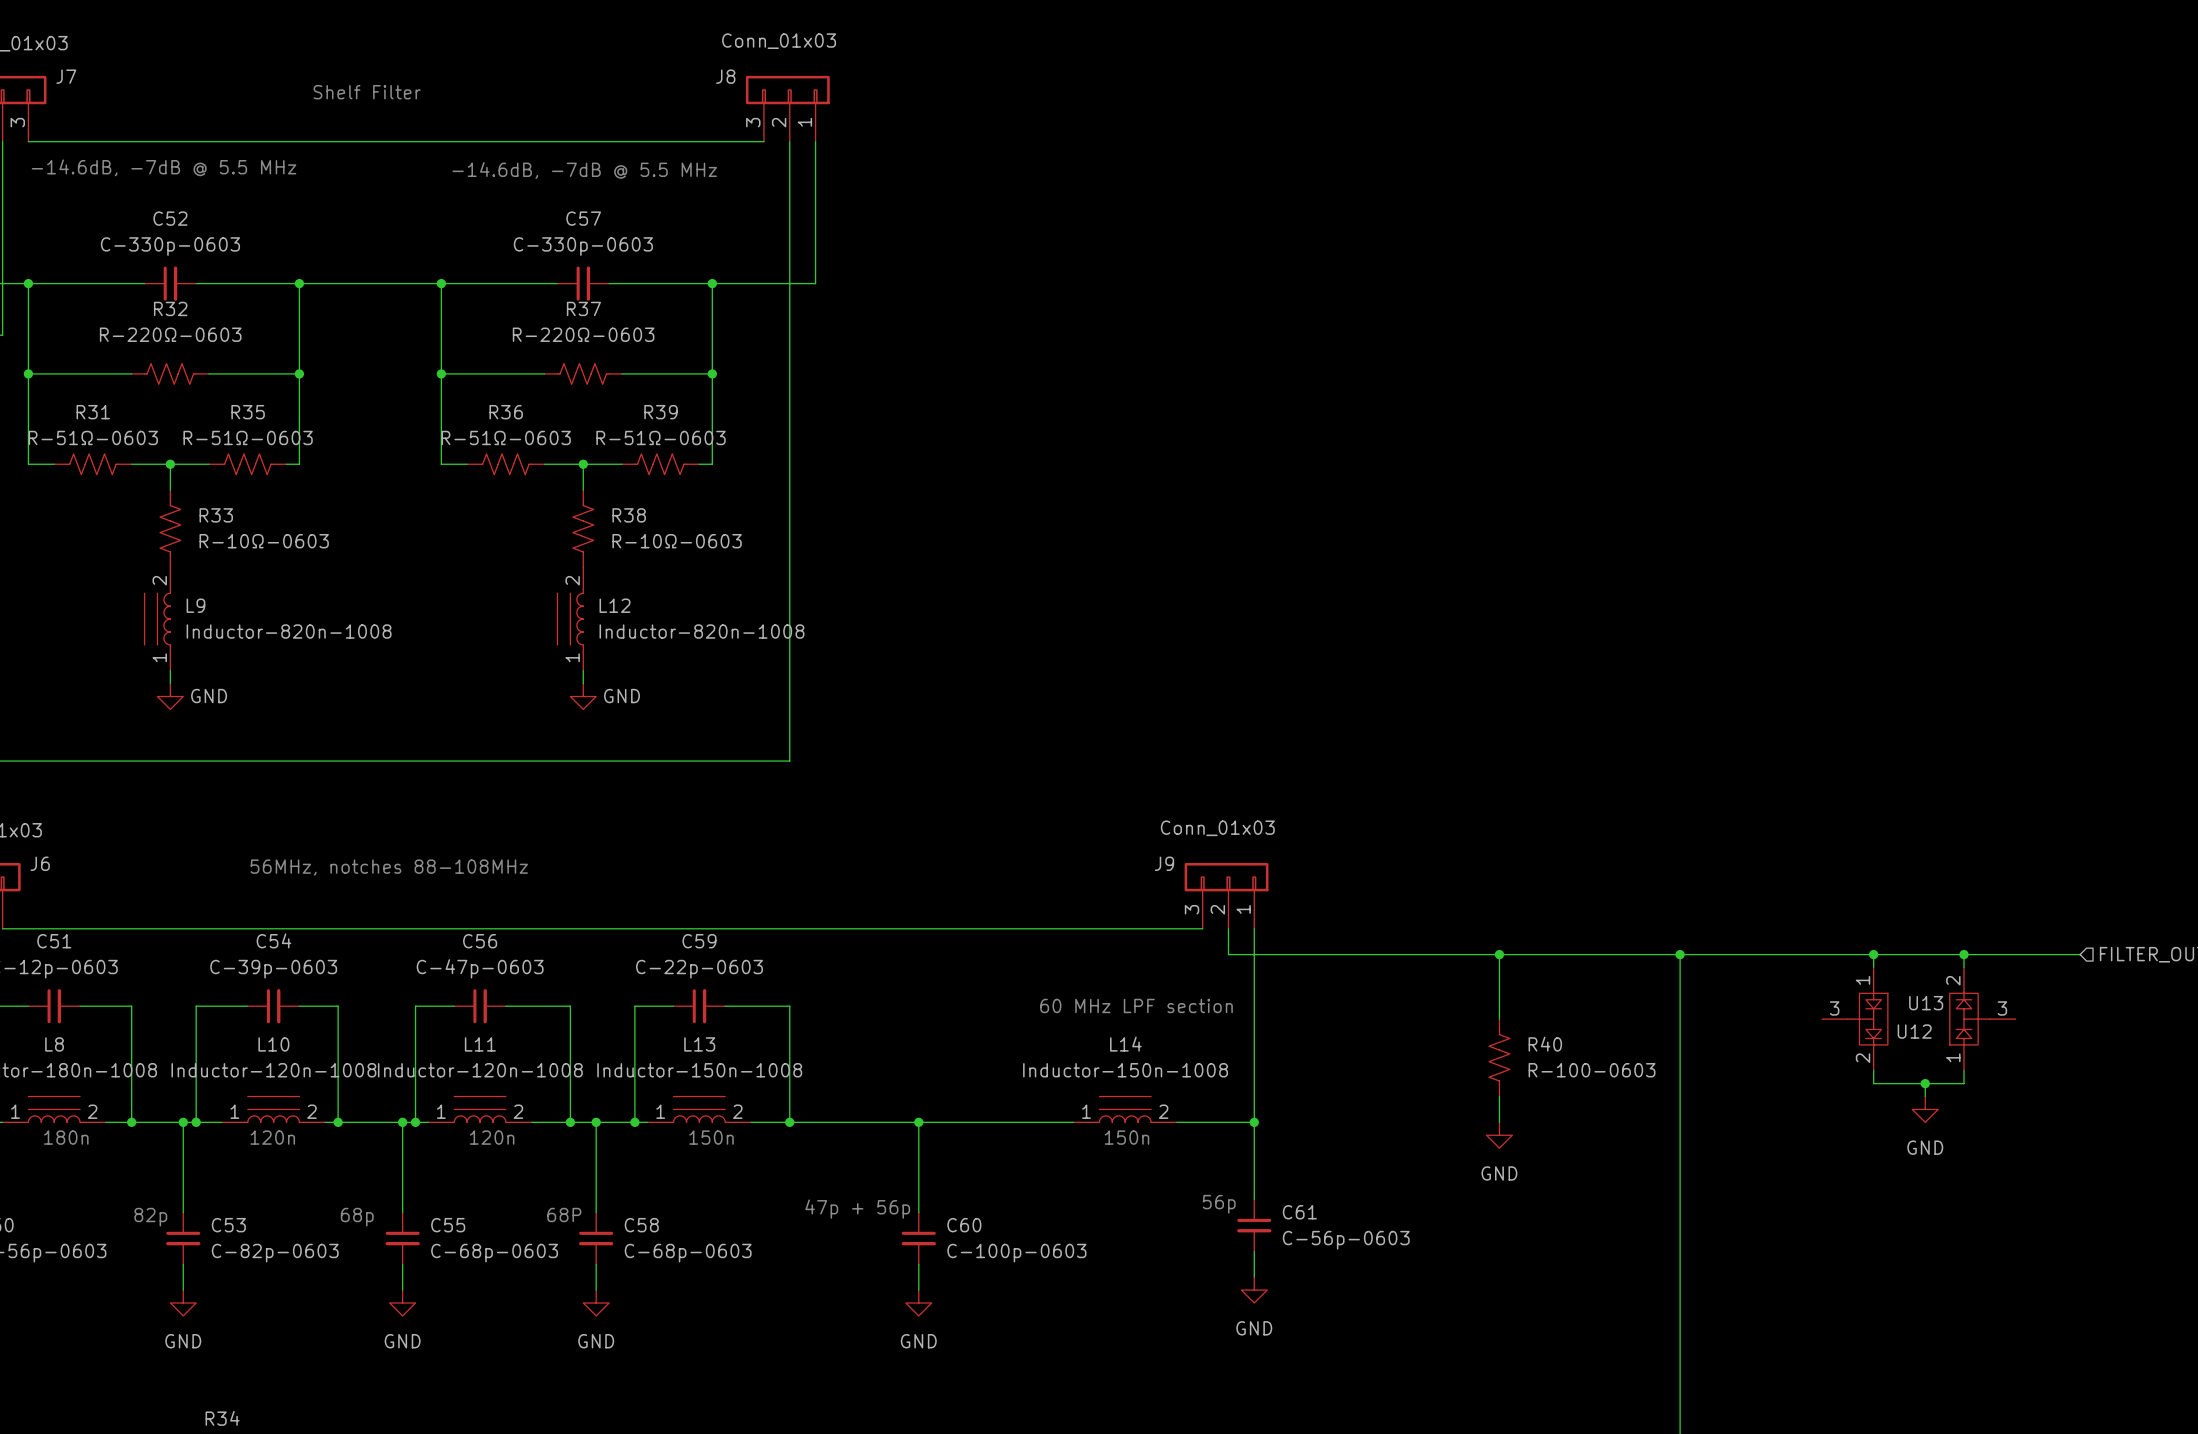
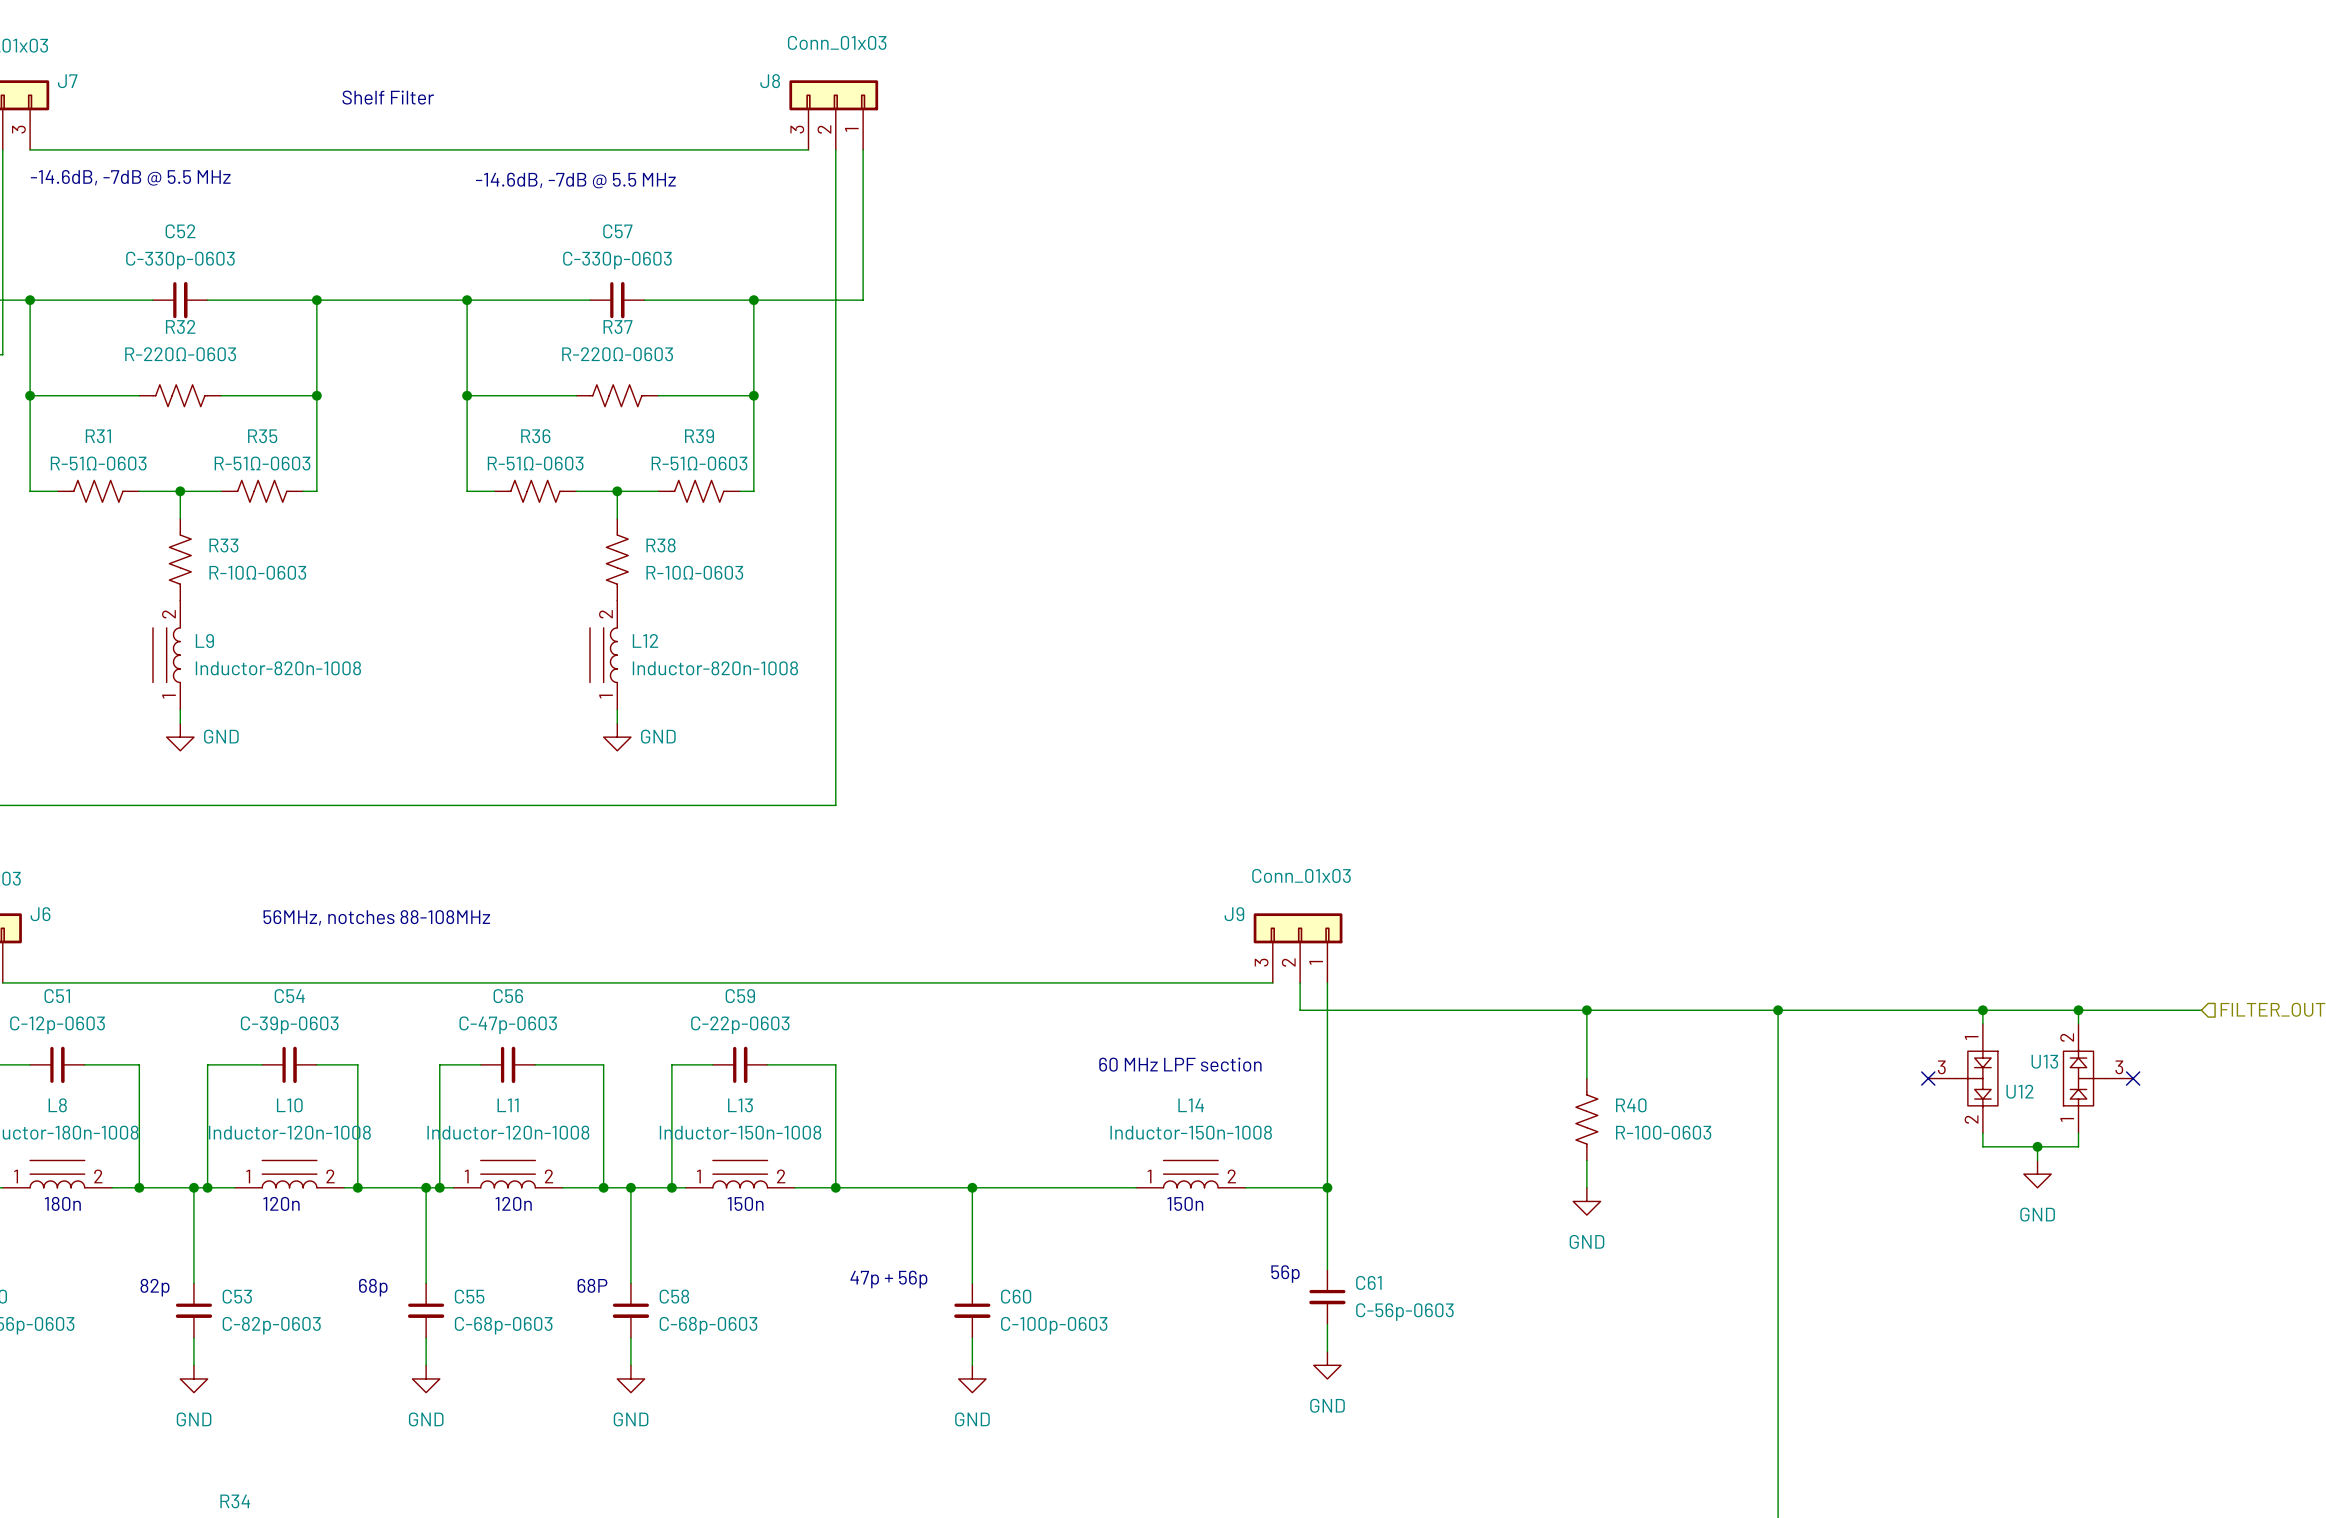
no-connect mark: none -> (1928, 1078)
no-connect mark: none -> (2133, 1078)

